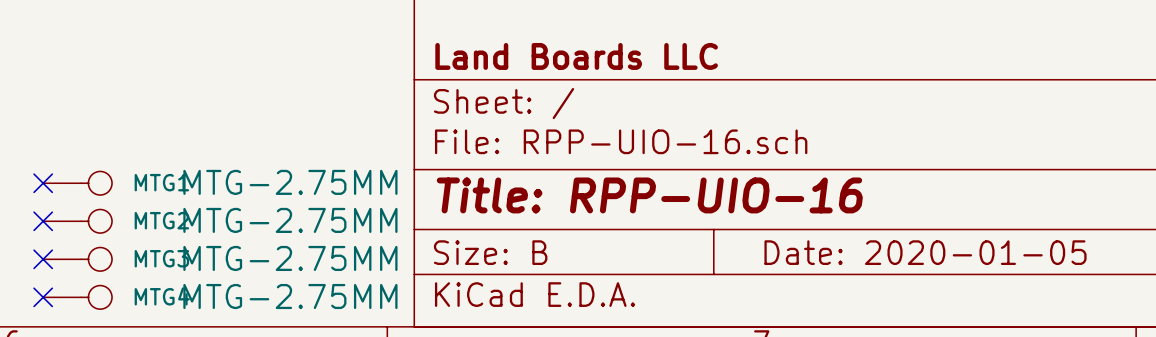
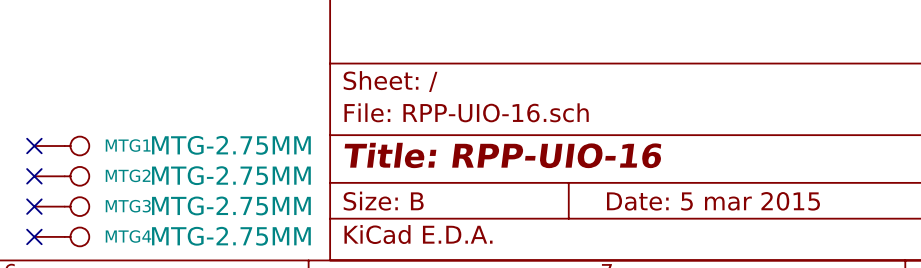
title block: Land Boards LLC (576, 56) -> none
title block: Date: 2020-01-05 (925, 252) -> Date: 5 mar 2015 (713, 201)

